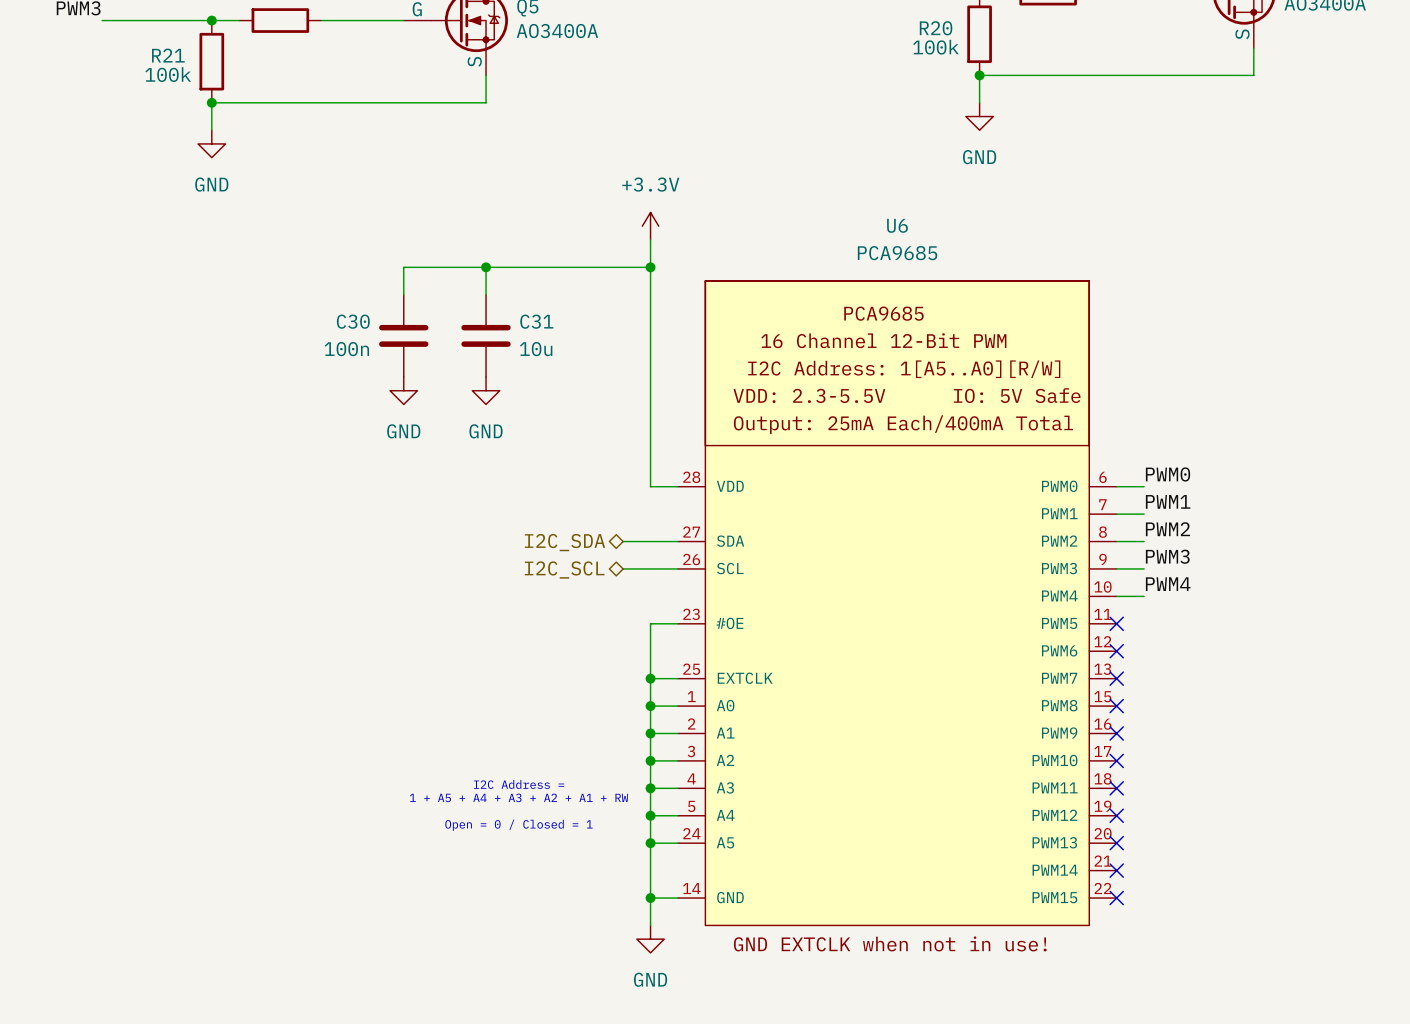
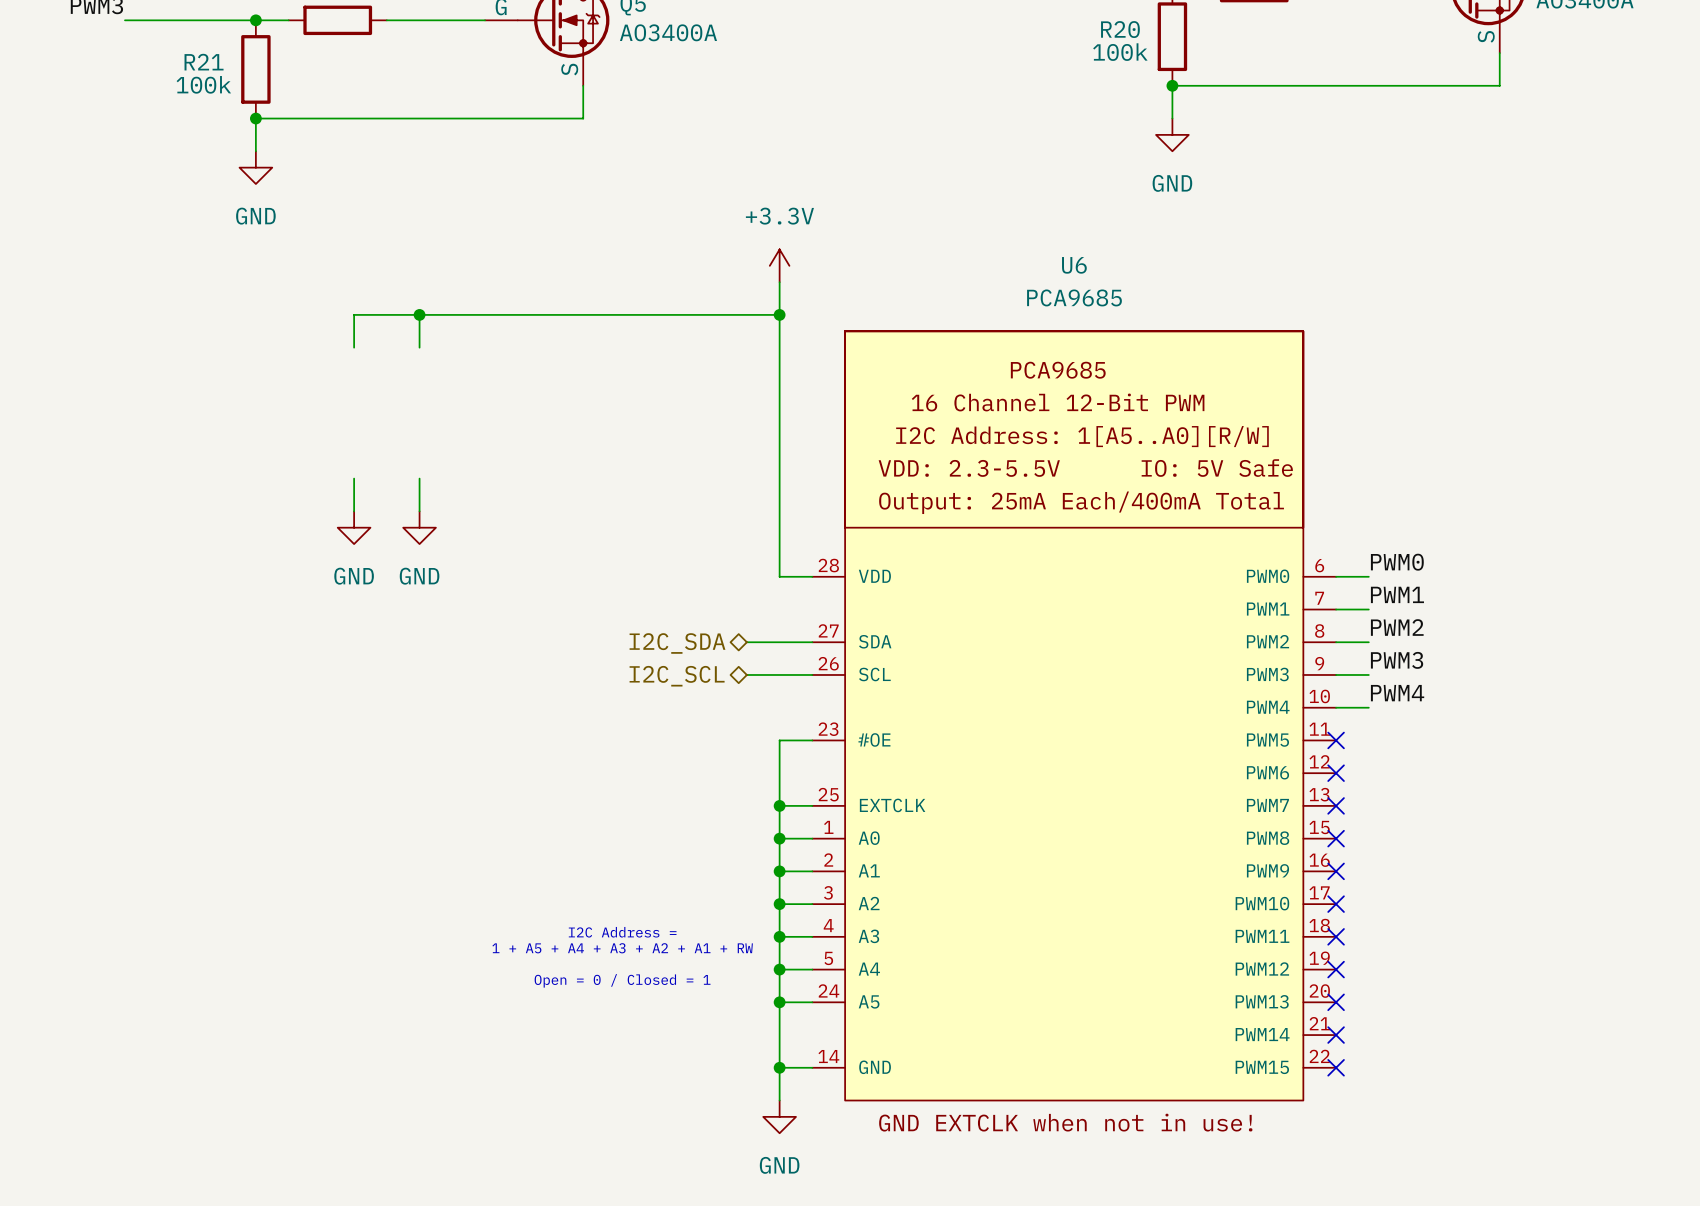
junction: none -> (419, 314)
wire: (403, 267) (403, 294) -> (485, 314) (354, 314) (354, 347)
wire: (486, 267) (486, 294) -> (419, 314) (419, 347)
junction: (486, 267) -> none
C30: 100n (403, 335) -> none
C31: 10u (486, 335) -> none
power symbol: GND (403, 390) -> none
power symbol: GND (486, 390) -> none
wire: none -> (354, 478) (354, 511)
wire: none -> (419, 478) (419, 511)
power symbol: none -> GND (354, 527)
power symbol: none -> GND (419, 527)

